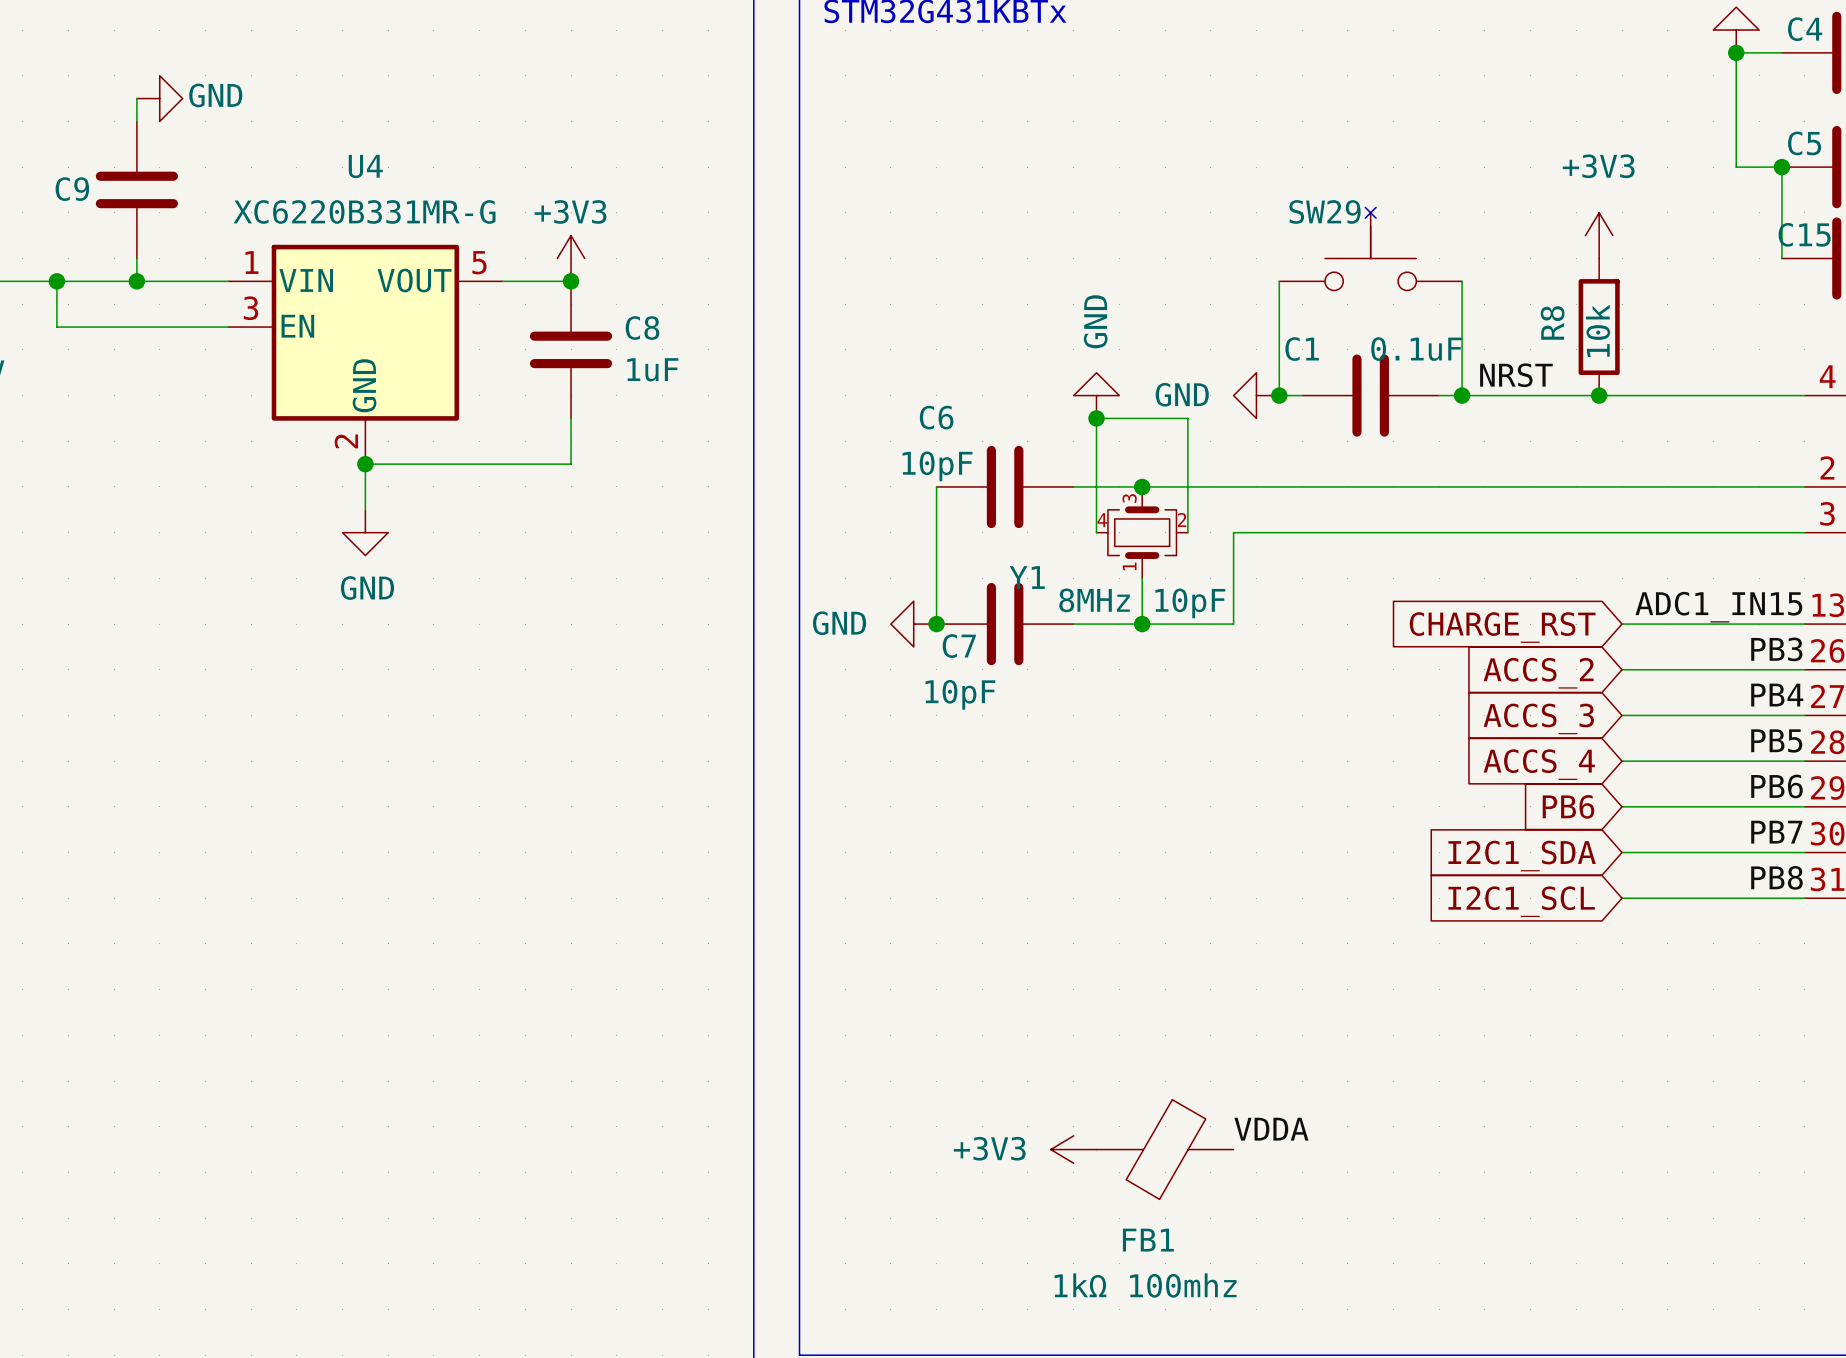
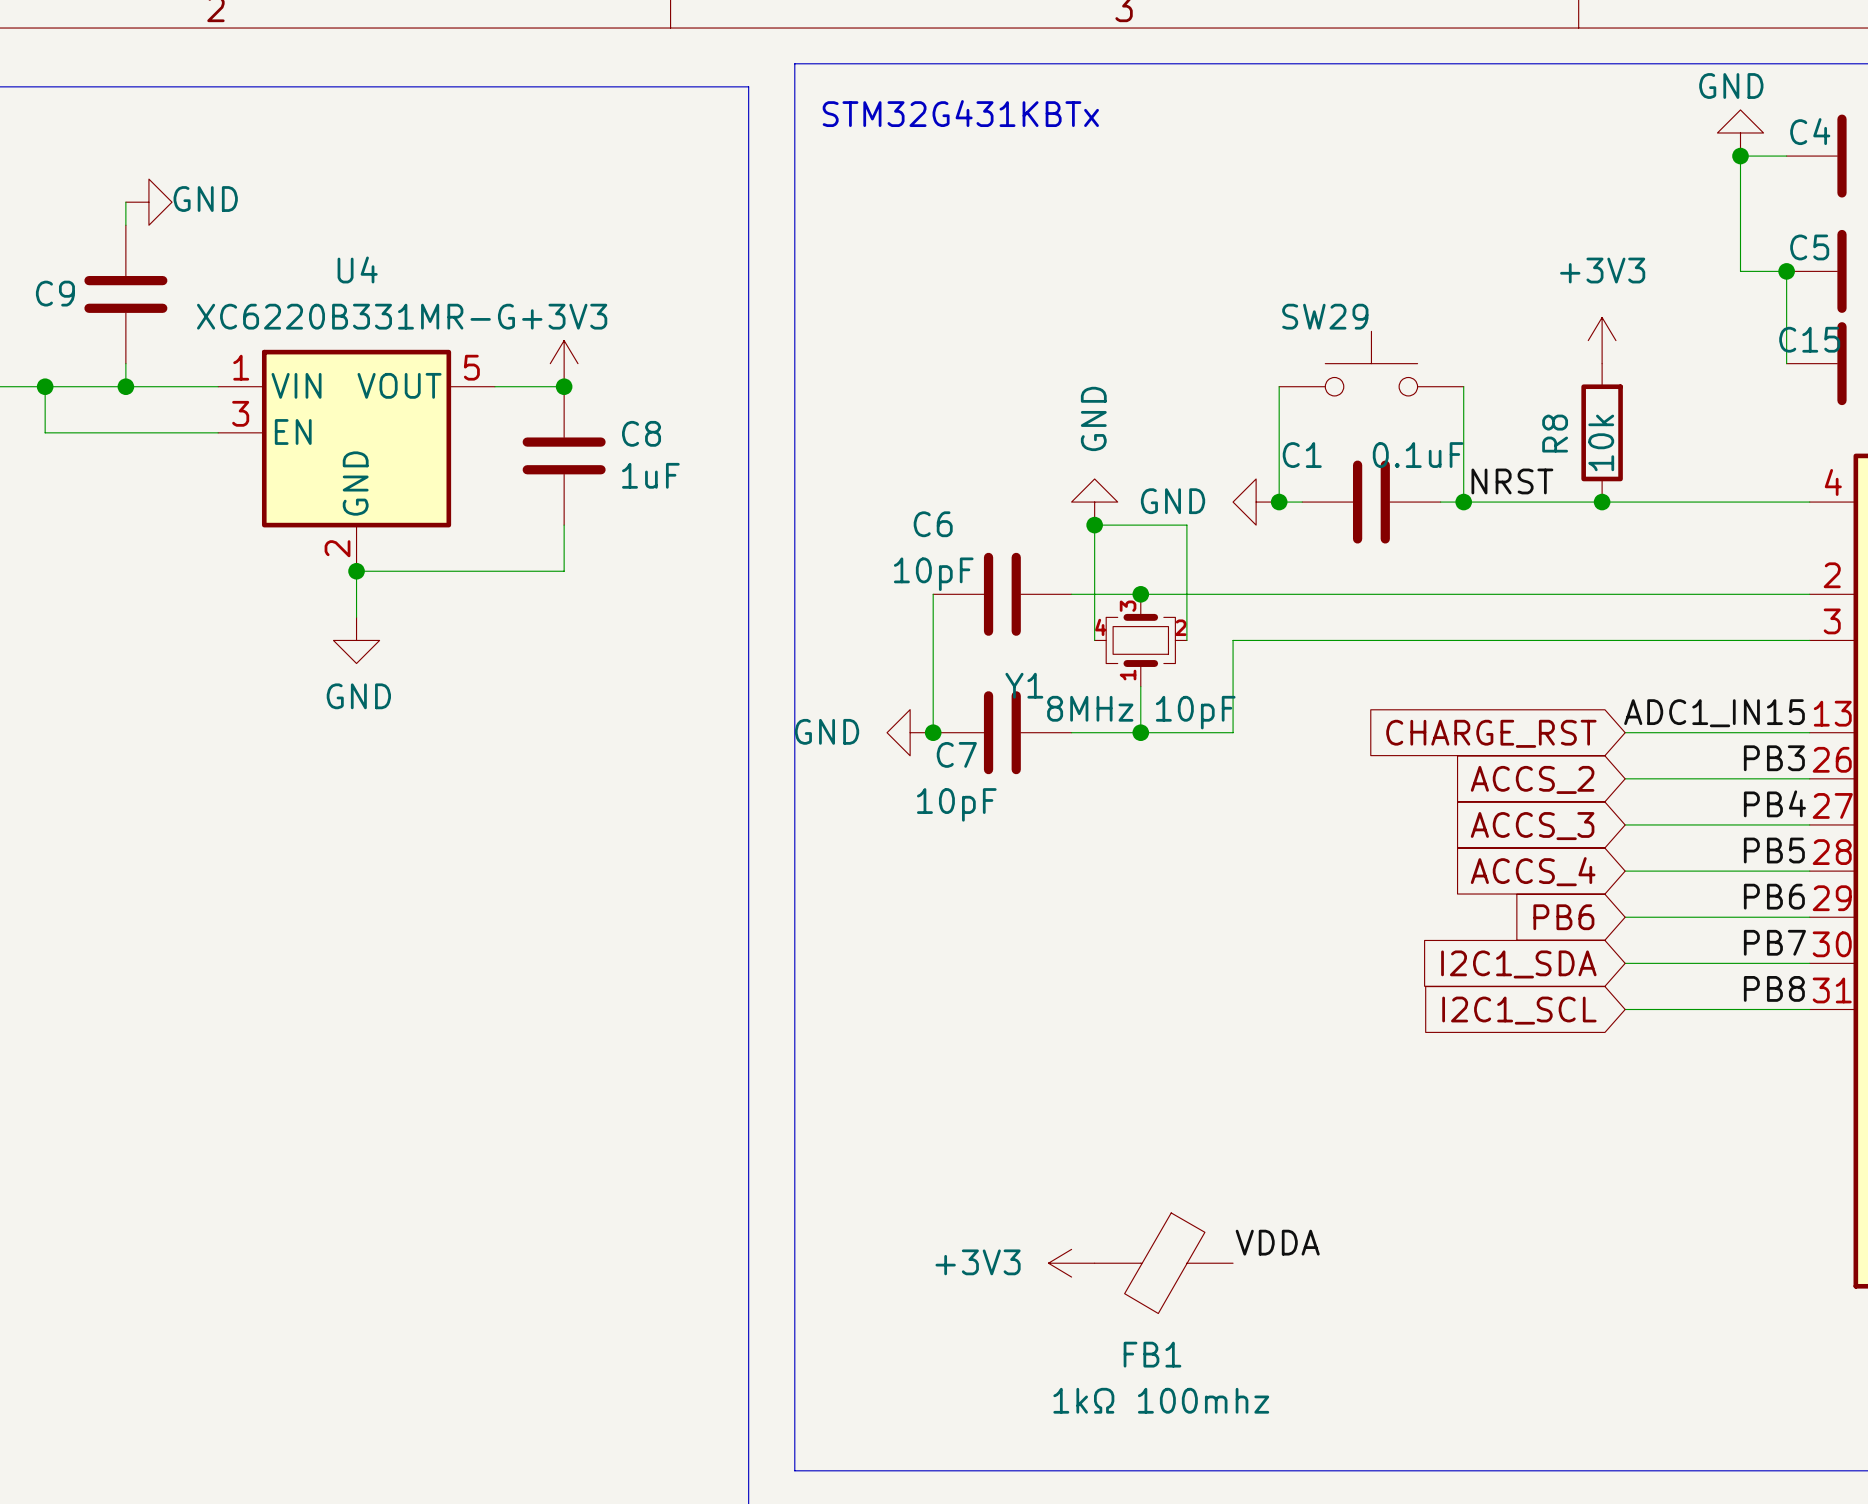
SW29 symbol: [1279, 207, 1463, 291] -> [1279, 331, 1464, 396]

